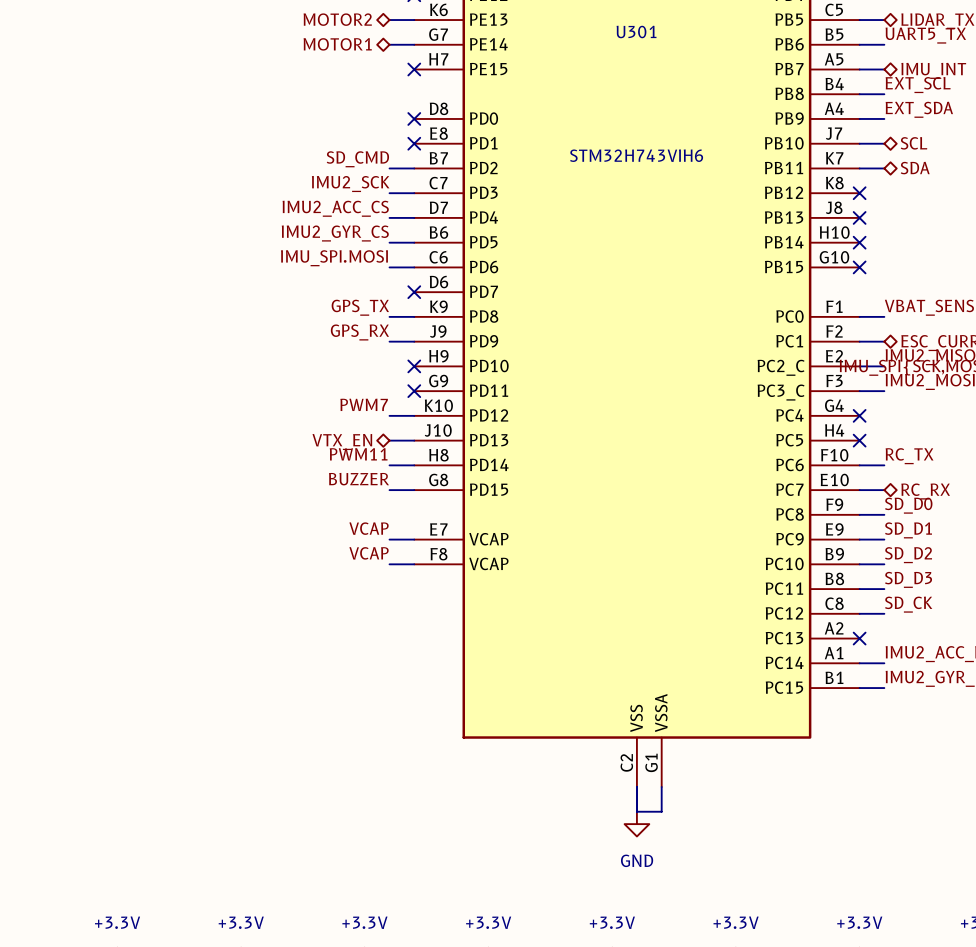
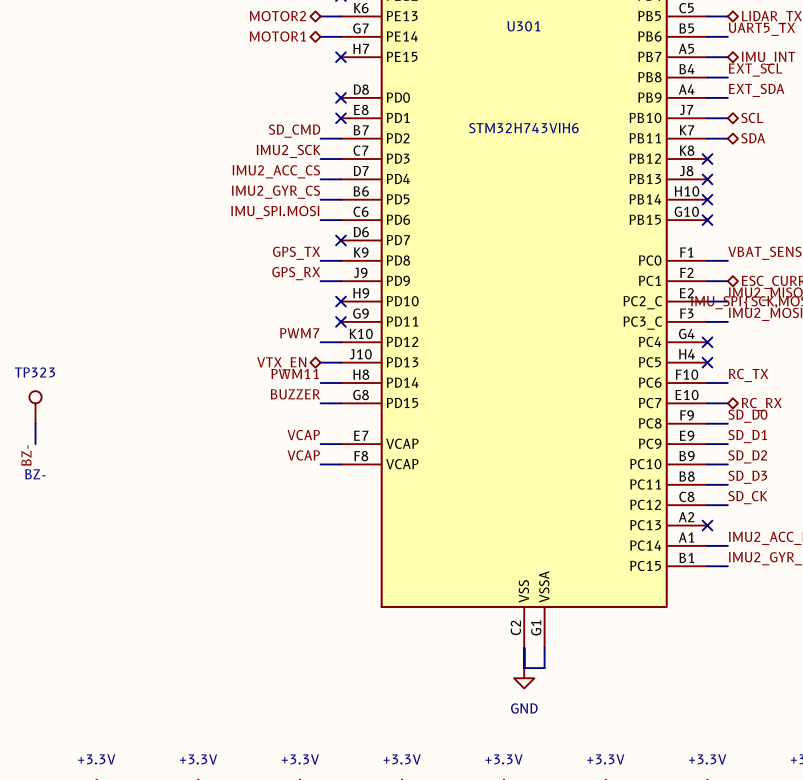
TP323: none -> BZ- (35, 407)
wire: none -> (35, 423) (35, 444)
label: none -> BZ- (26, 455)

